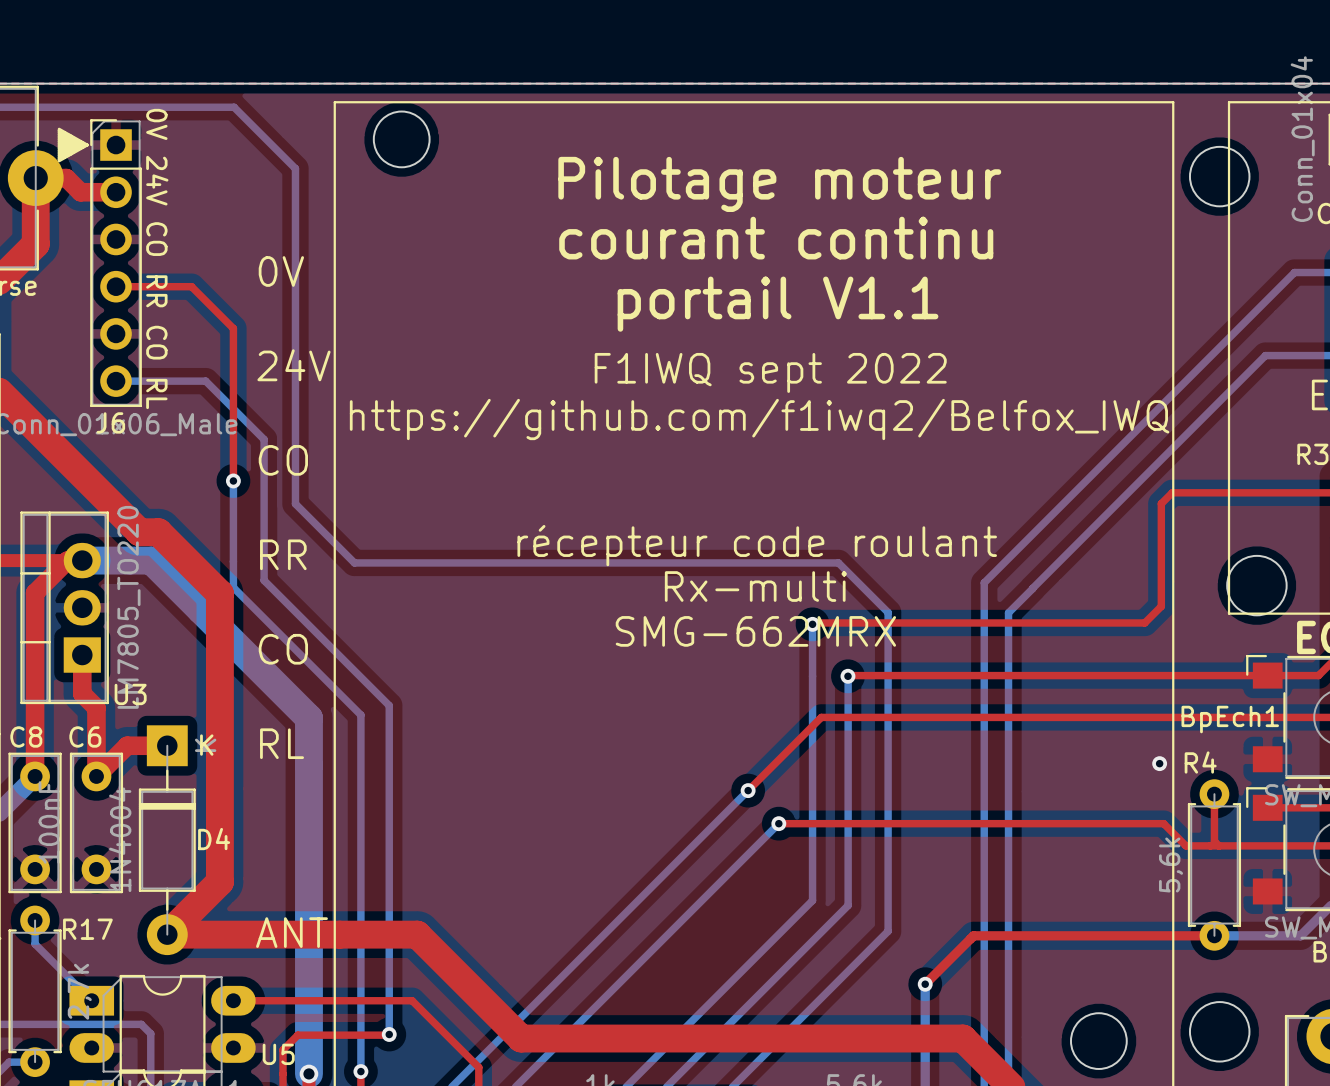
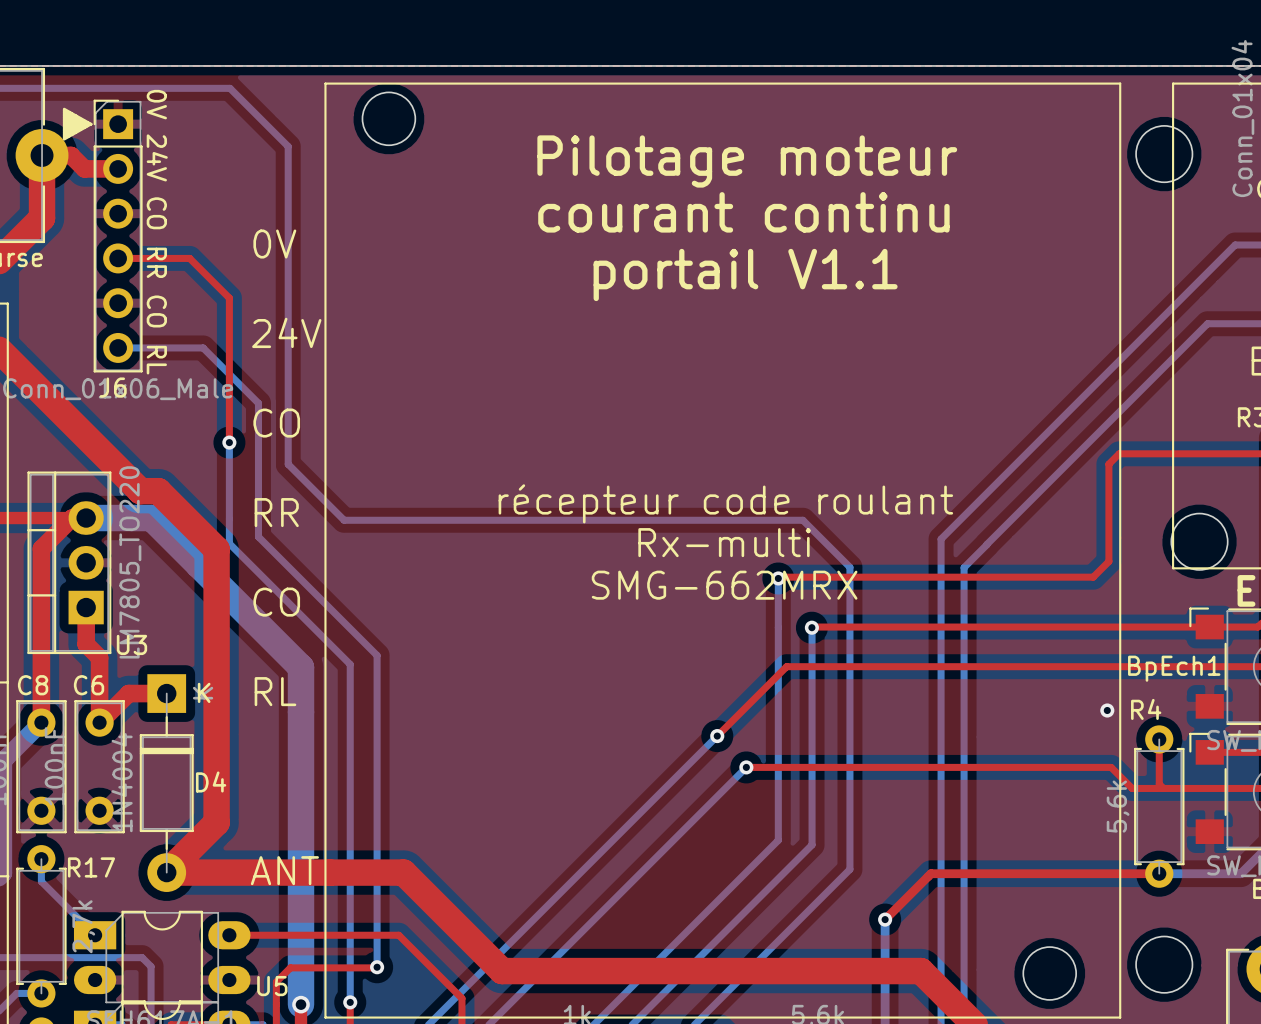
text: F1IWQ sept 2022 (770, 372) -> none
text: https://github.com/f1iwq2/Belfox_IWQ (759, 419) -> none

